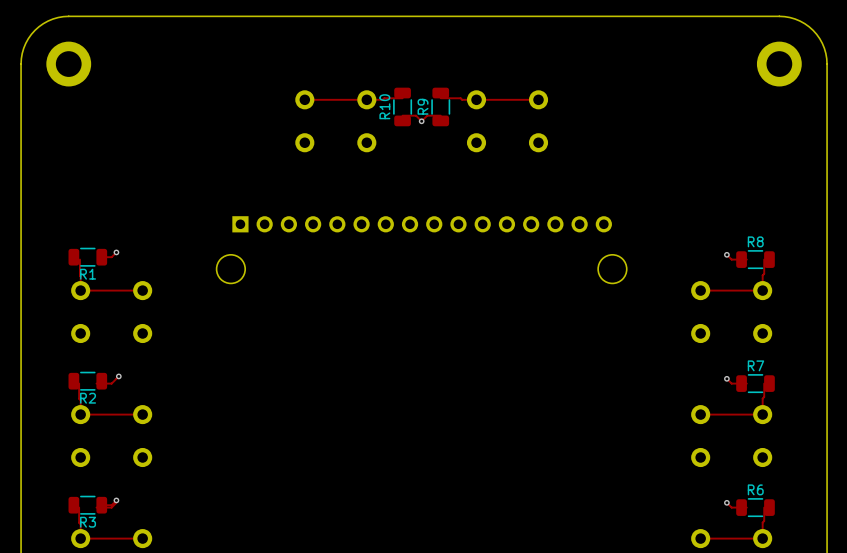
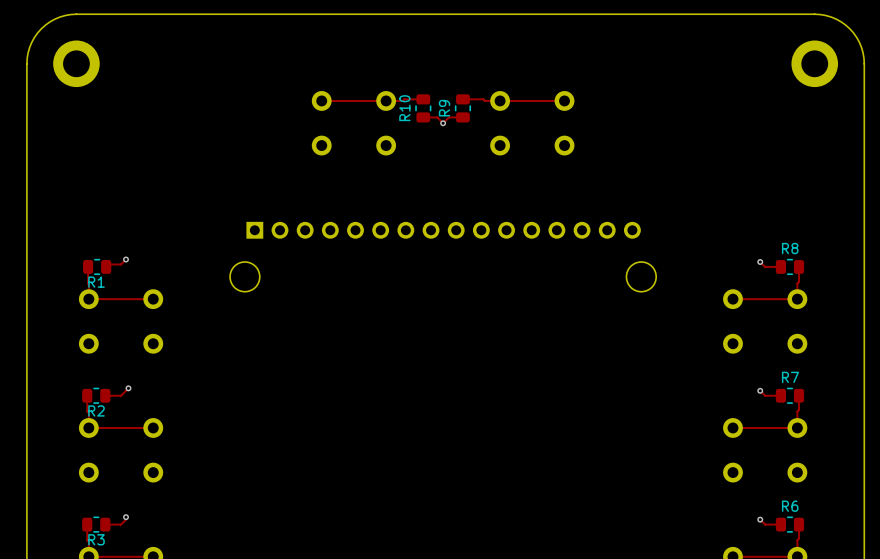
R10 footprint: [393, 87, 412, 127] -> [415, 94, 432, 123]
R9 footprint: [431, 87, 450, 127] -> [455, 94, 471, 123]
R1 footprint: [68, 247, 108, 267] -> [83, 259, 112, 275]
R8 footprint: [736, 250, 775, 269] -> [775, 259, 805, 275]
R2 footprint: [68, 371, 108, 391] -> [82, 387, 111, 404]
R7 footprint: [736, 374, 775, 393] -> [775, 387, 805, 404]
R3 footprint: [68, 495, 108, 515] -> [82, 516, 111, 533]
R6 footprint: [736, 498, 775, 517] -> [775, 516, 805, 533]
track: (116, 500) (111, 505) (101, 505) -> none

